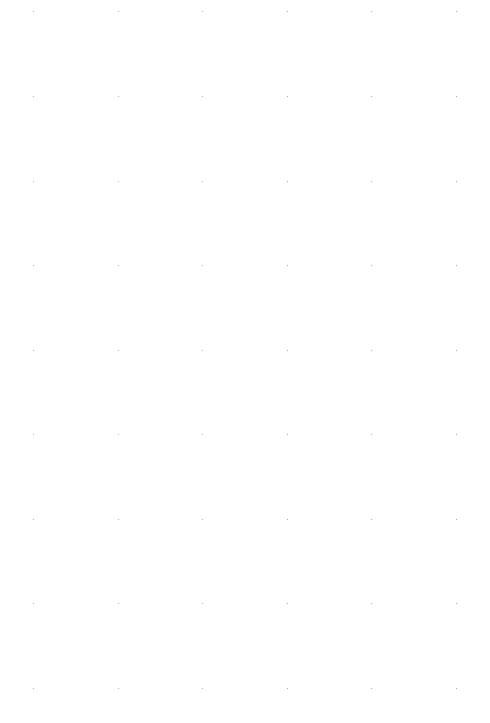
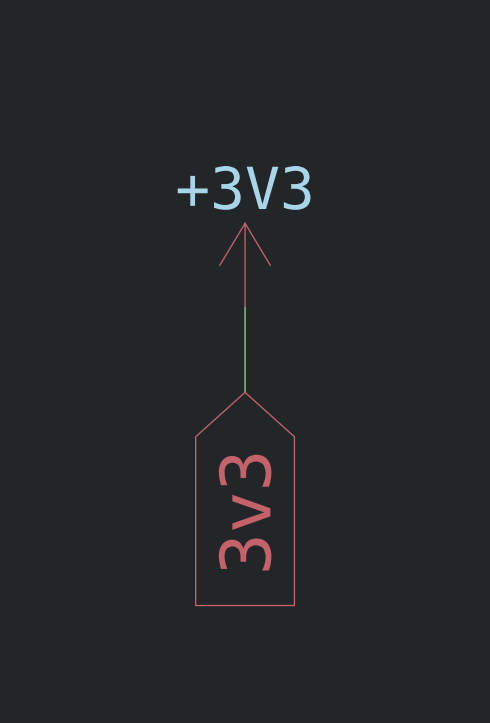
power symbol: none -> +3V3 (245, 265)
wire: none -> (245, 307) (245, 392)
global label: none -> 3v3 (245, 512)

